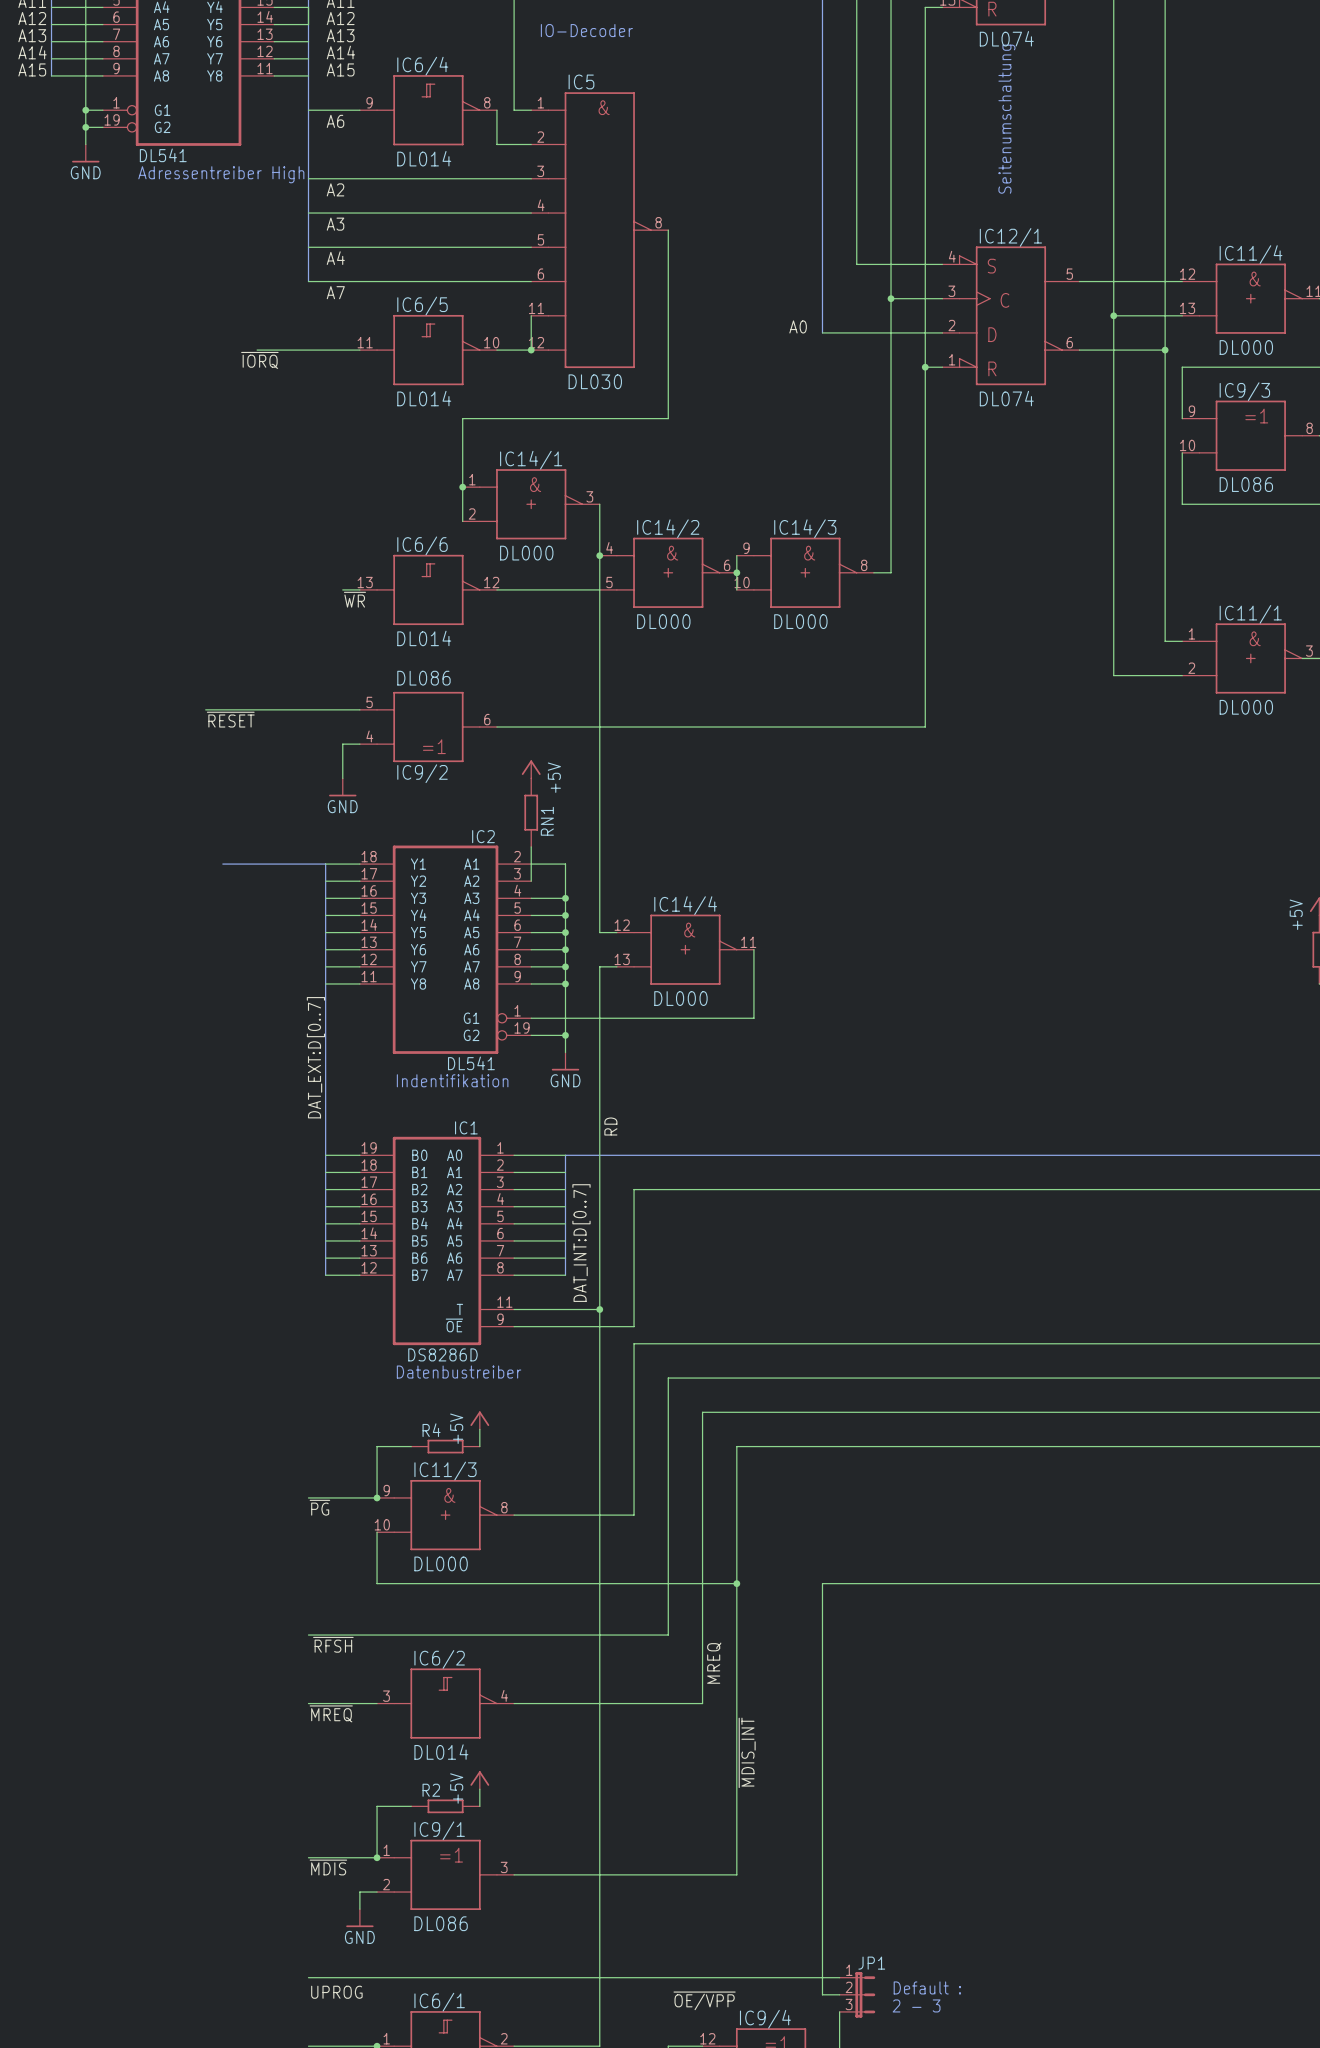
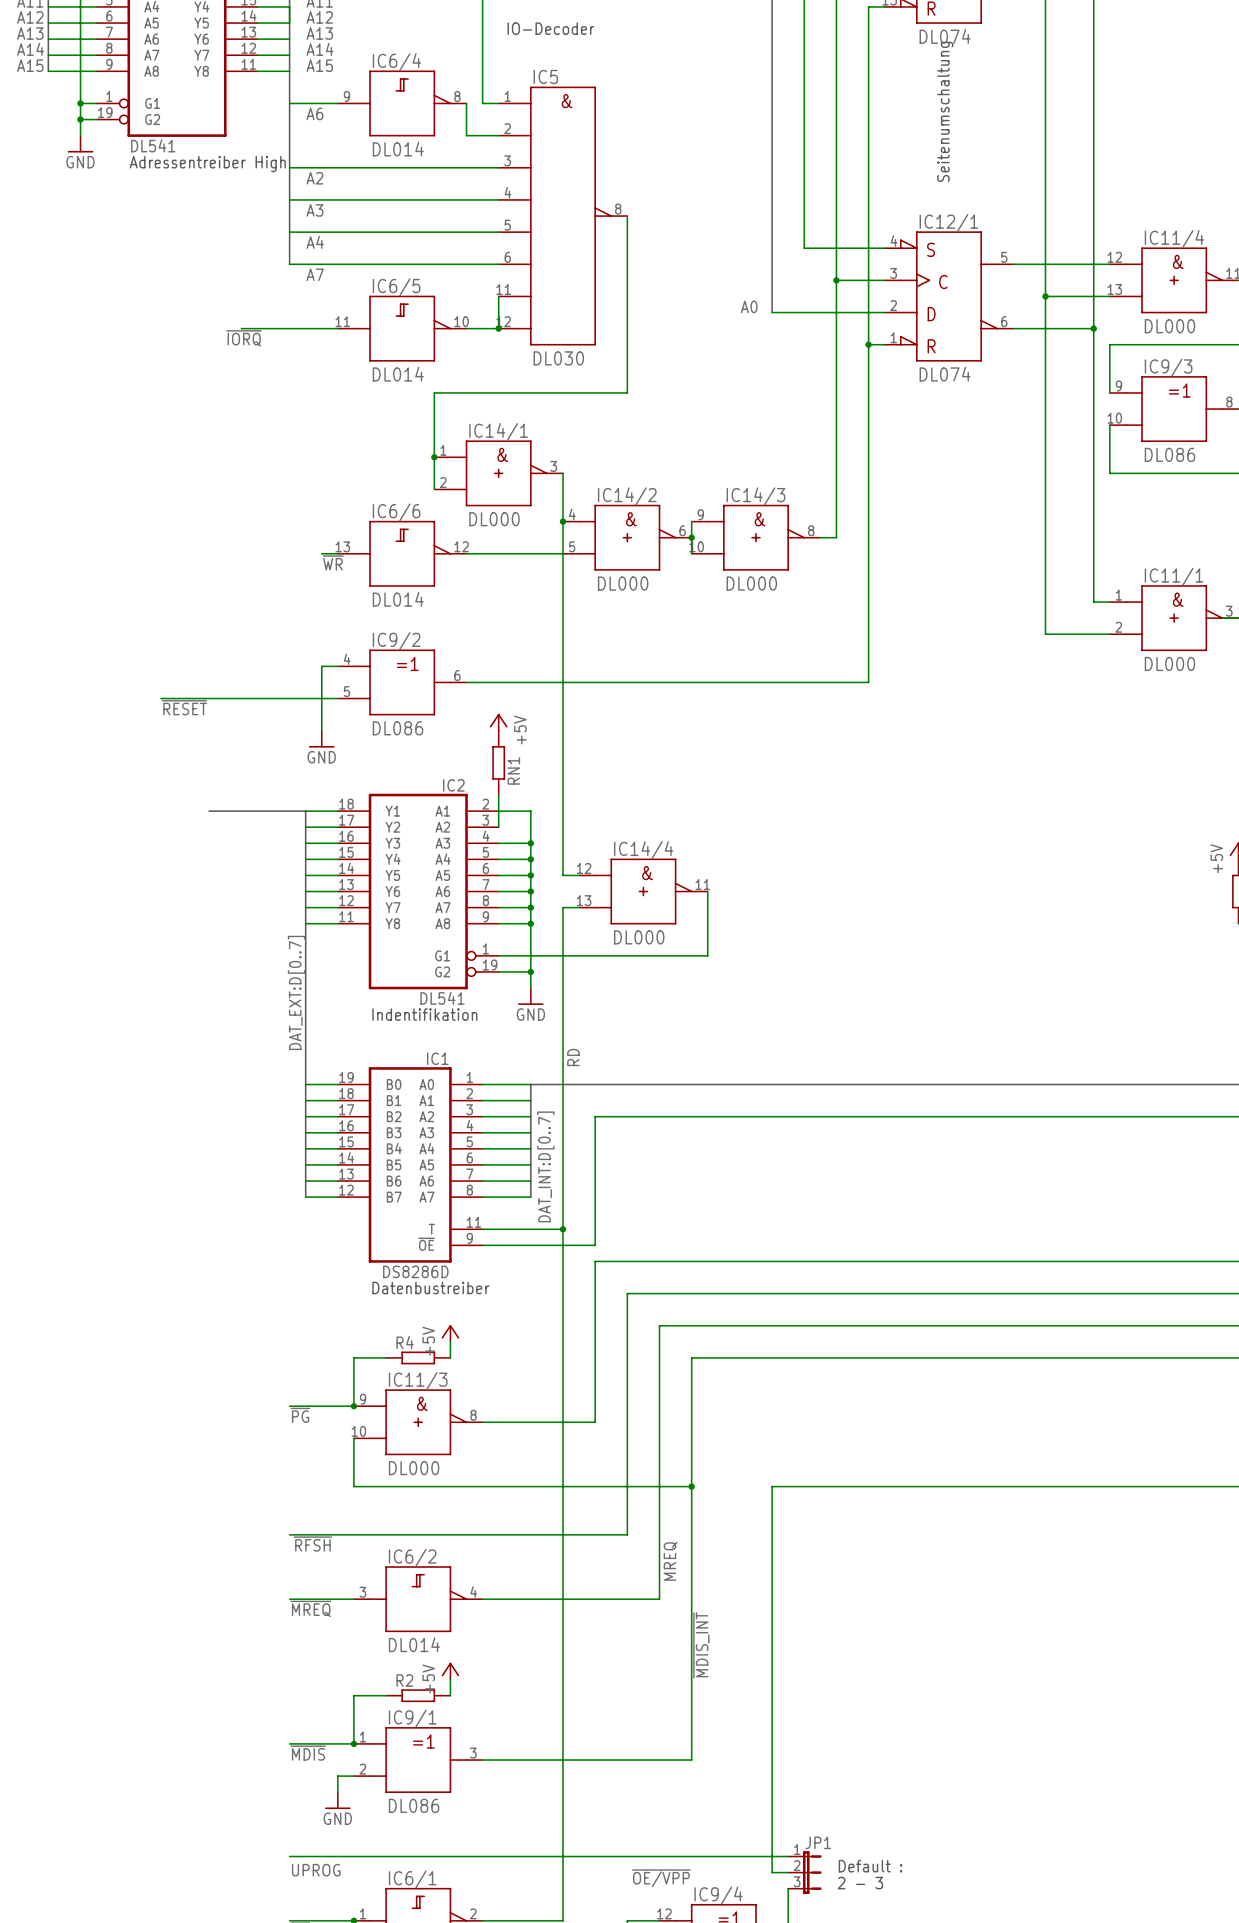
IC9/2 value position: DL086 (423, 678) -> DL086 (397, 728)
IC9/2 pin number: 5 (369, 702) -> 4 (347, 659)
wire: (205, 709) (342, 709) -> (160, 698) (321, 698) (321, 666)
label position: ~{RESET} (230, 719) -> ~{RESET} (184, 707)
IC9/2 pin number: 4 (369, 736) -> 5 (346, 691)
IC9/2 text position: =1 (434, 746) -> =1 (407, 663)
IC9/2 name position: IC9/2 (422, 773) -> IC9/2 (396, 641)

